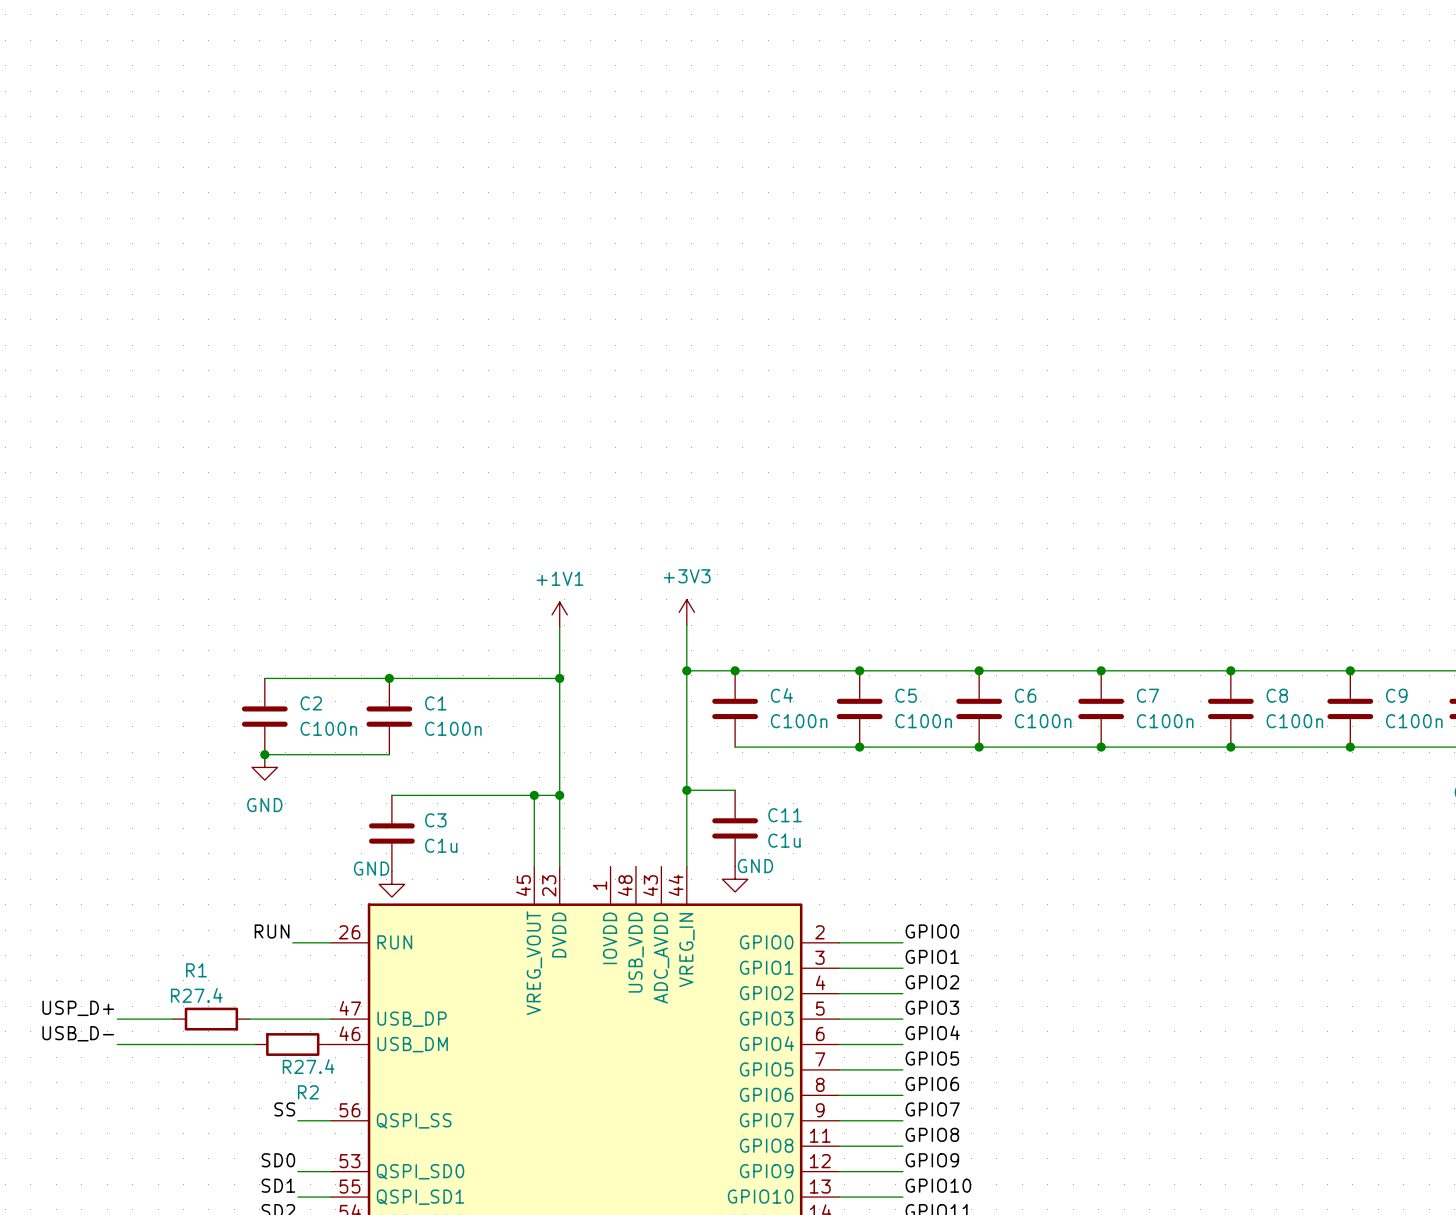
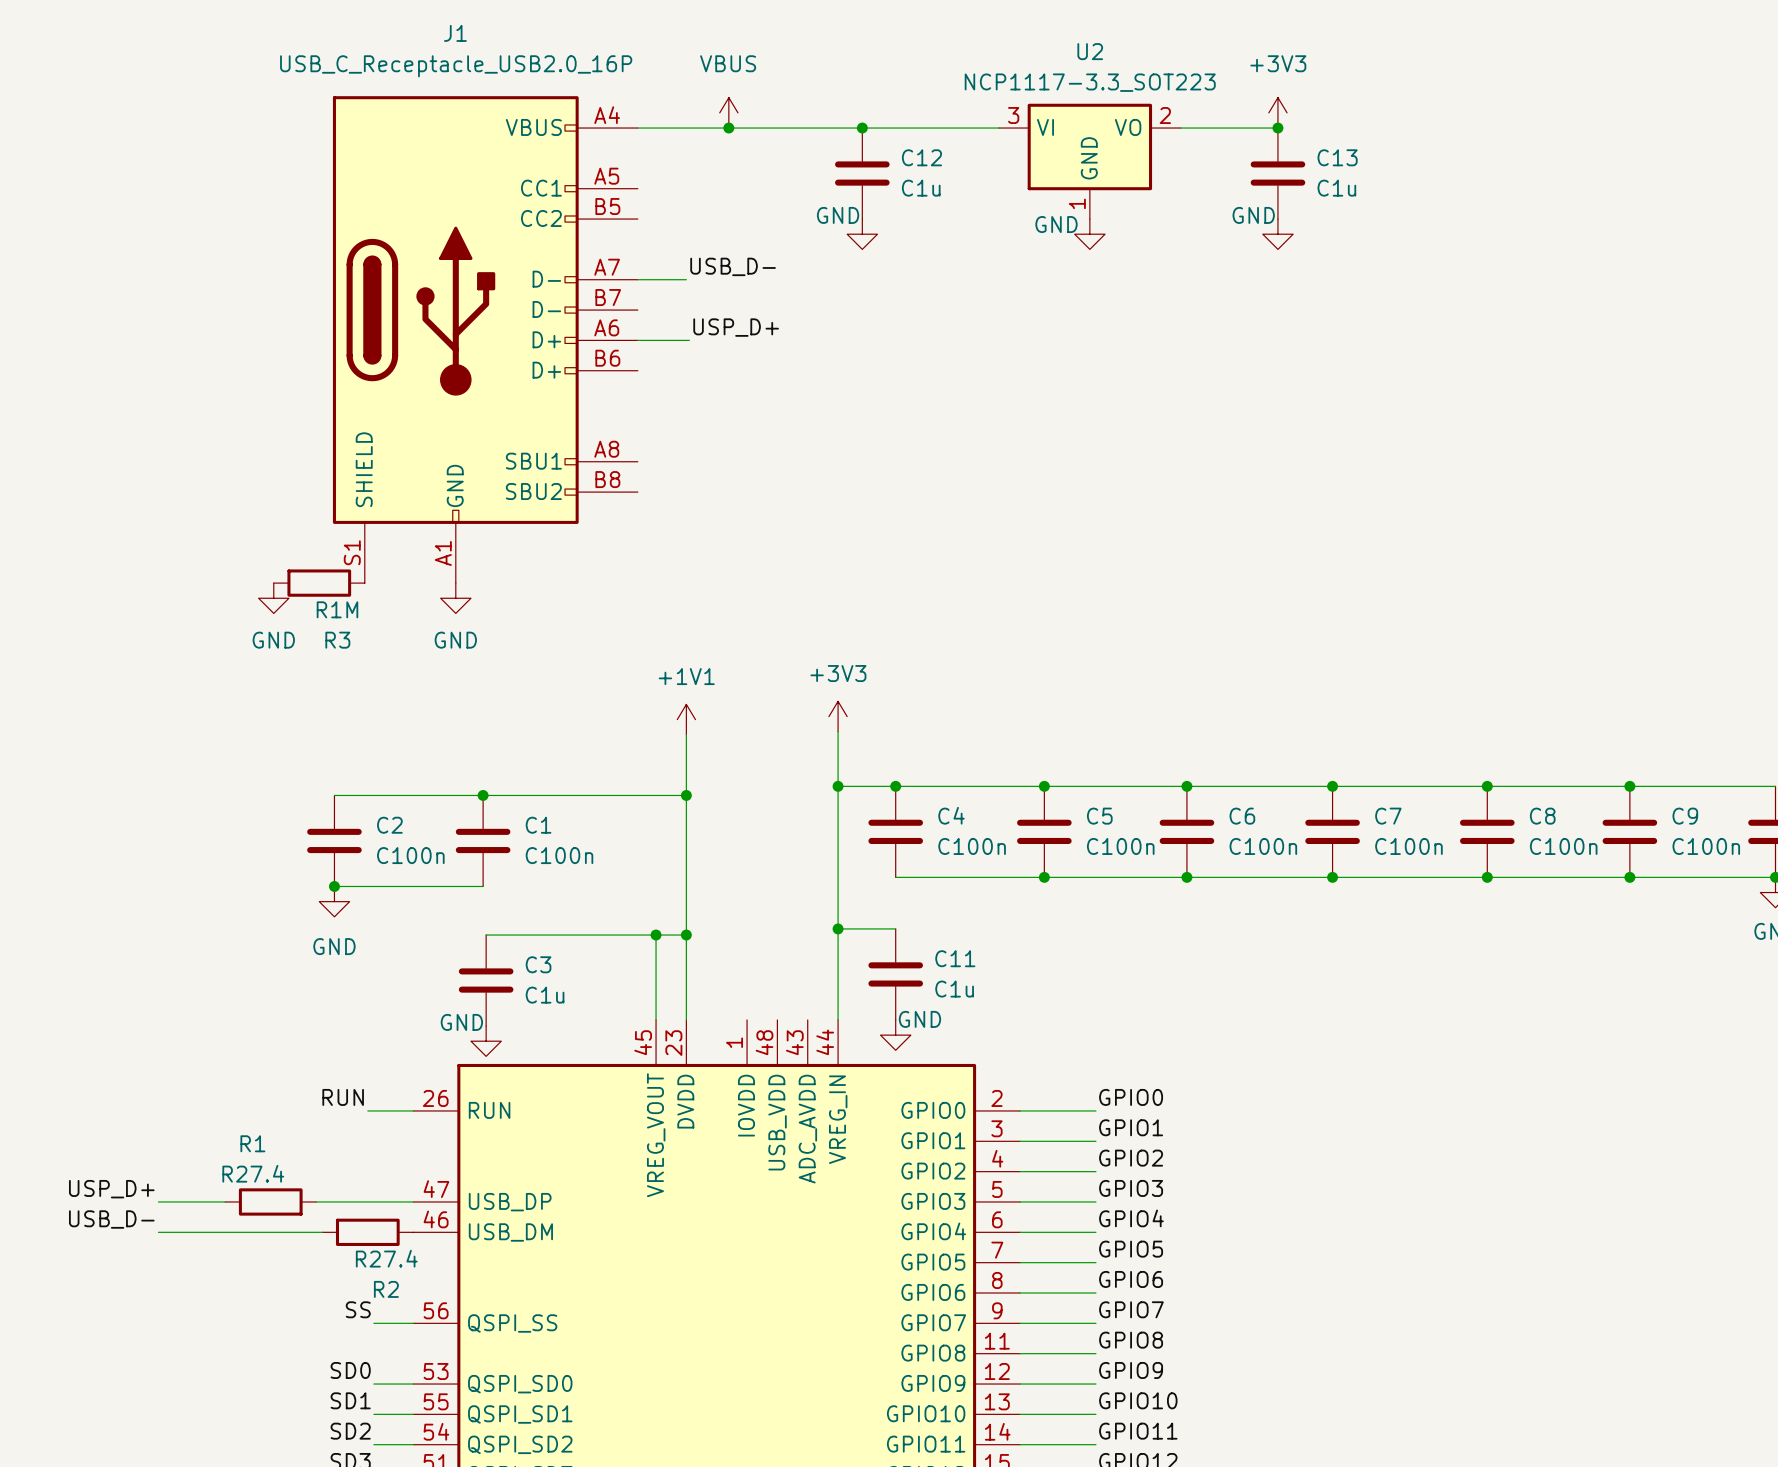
power symbol: none -> VBUS (728, 112)
power symbol: none -> +3V3 (1277, 112)
wire: none -> (637, 128) (998, 128)
junction: none -> (728, 128)
junction: none -> (862, 128)
wire: none -> (1180, 128) (1277, 128)
junction: none -> (1277, 128)
U2: none -> NCP1117-3.3_SOT223 (1089, 161)
C12: none -> C1u (862, 173)
C13: none -> C1u (1277, 173)
power symbol: none -> GND (862, 234)
power symbol: none -> GND (1089, 234)
power symbol: none -> GND (1277, 234)
label: none -> USB_D- (733, 266)
wire: none -> (637, 279) (686, 279)
label: none -> USP_D+ (736, 327)
J1: none -> USB_C_Receptacle_USB2.0_16P (485, 339)
wire: none -> (637, 340) (689, 340)
R3: none -> R1M (319, 583)
power symbol: none -> GND (273, 598)
power symbol: none -> GND (455, 598)

